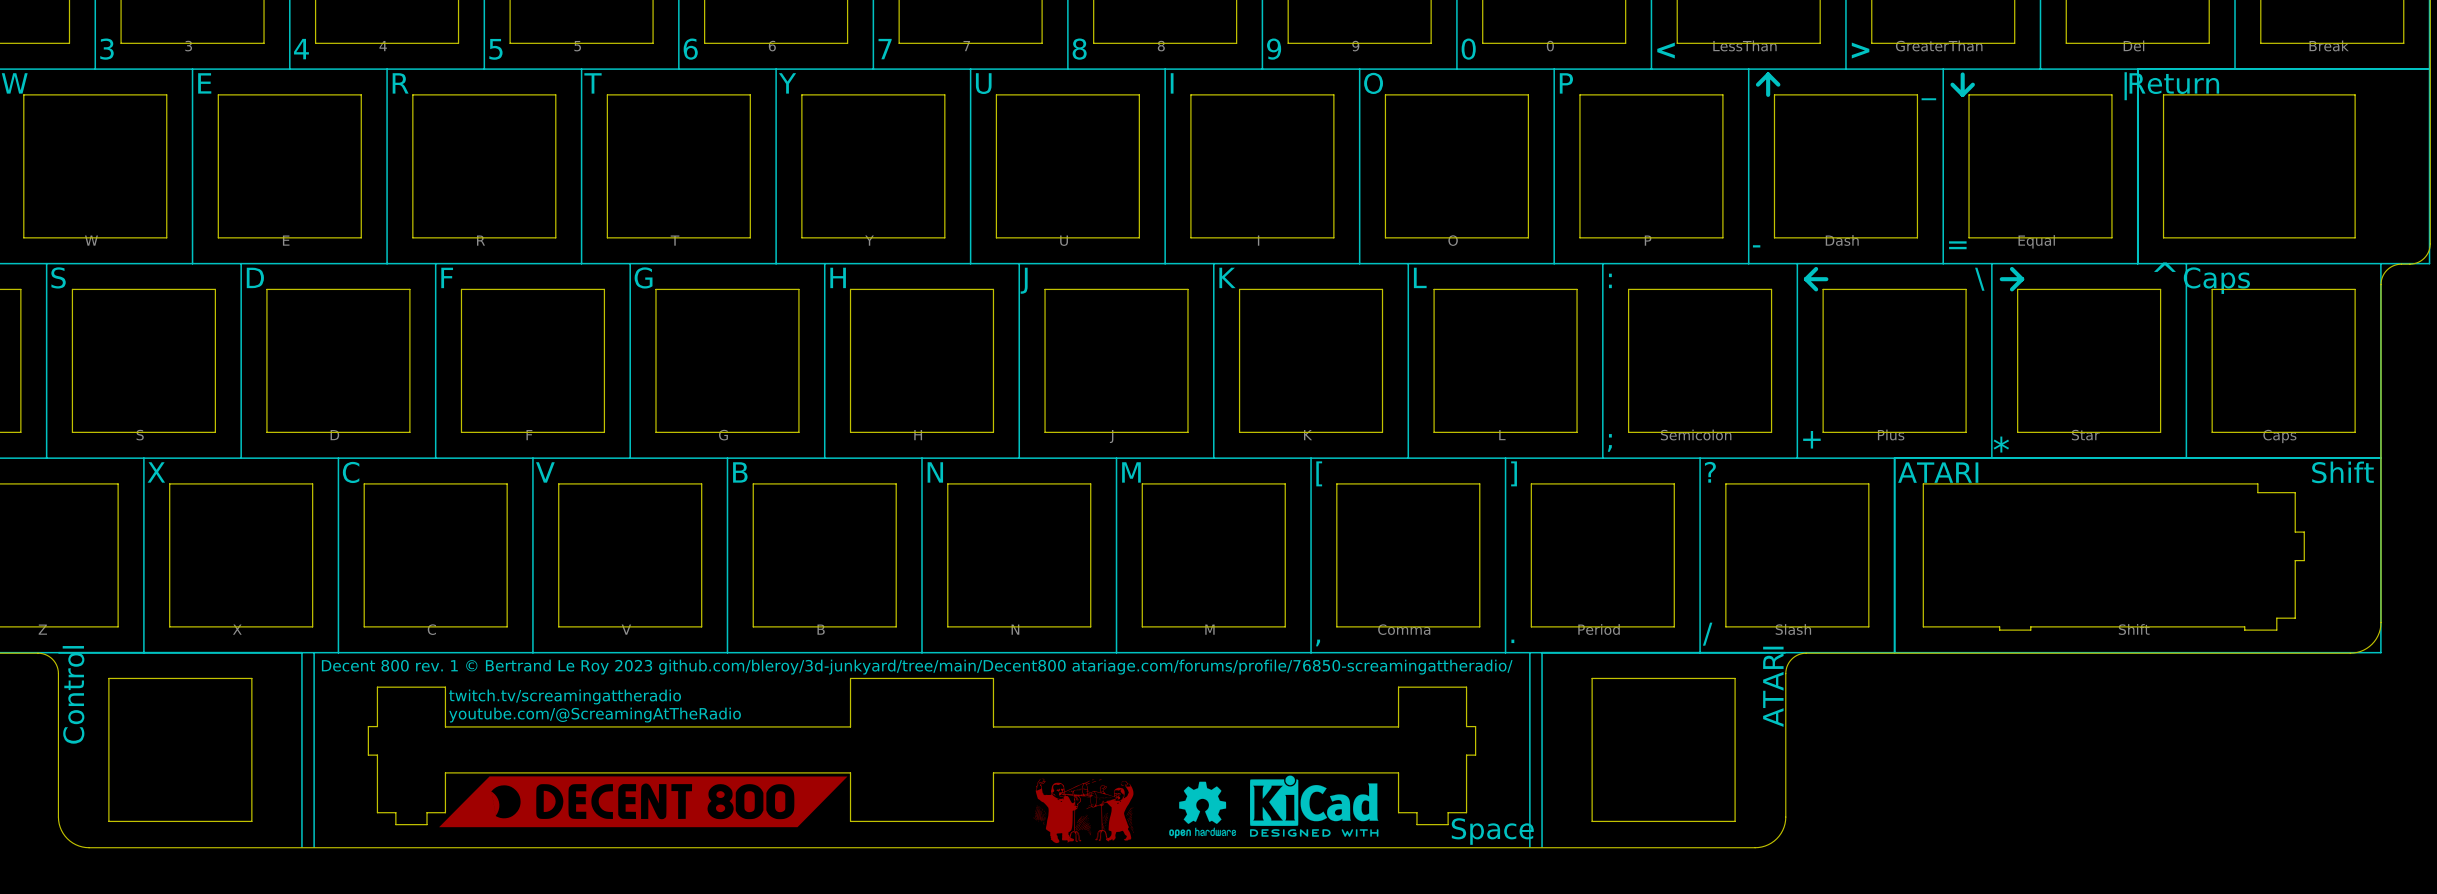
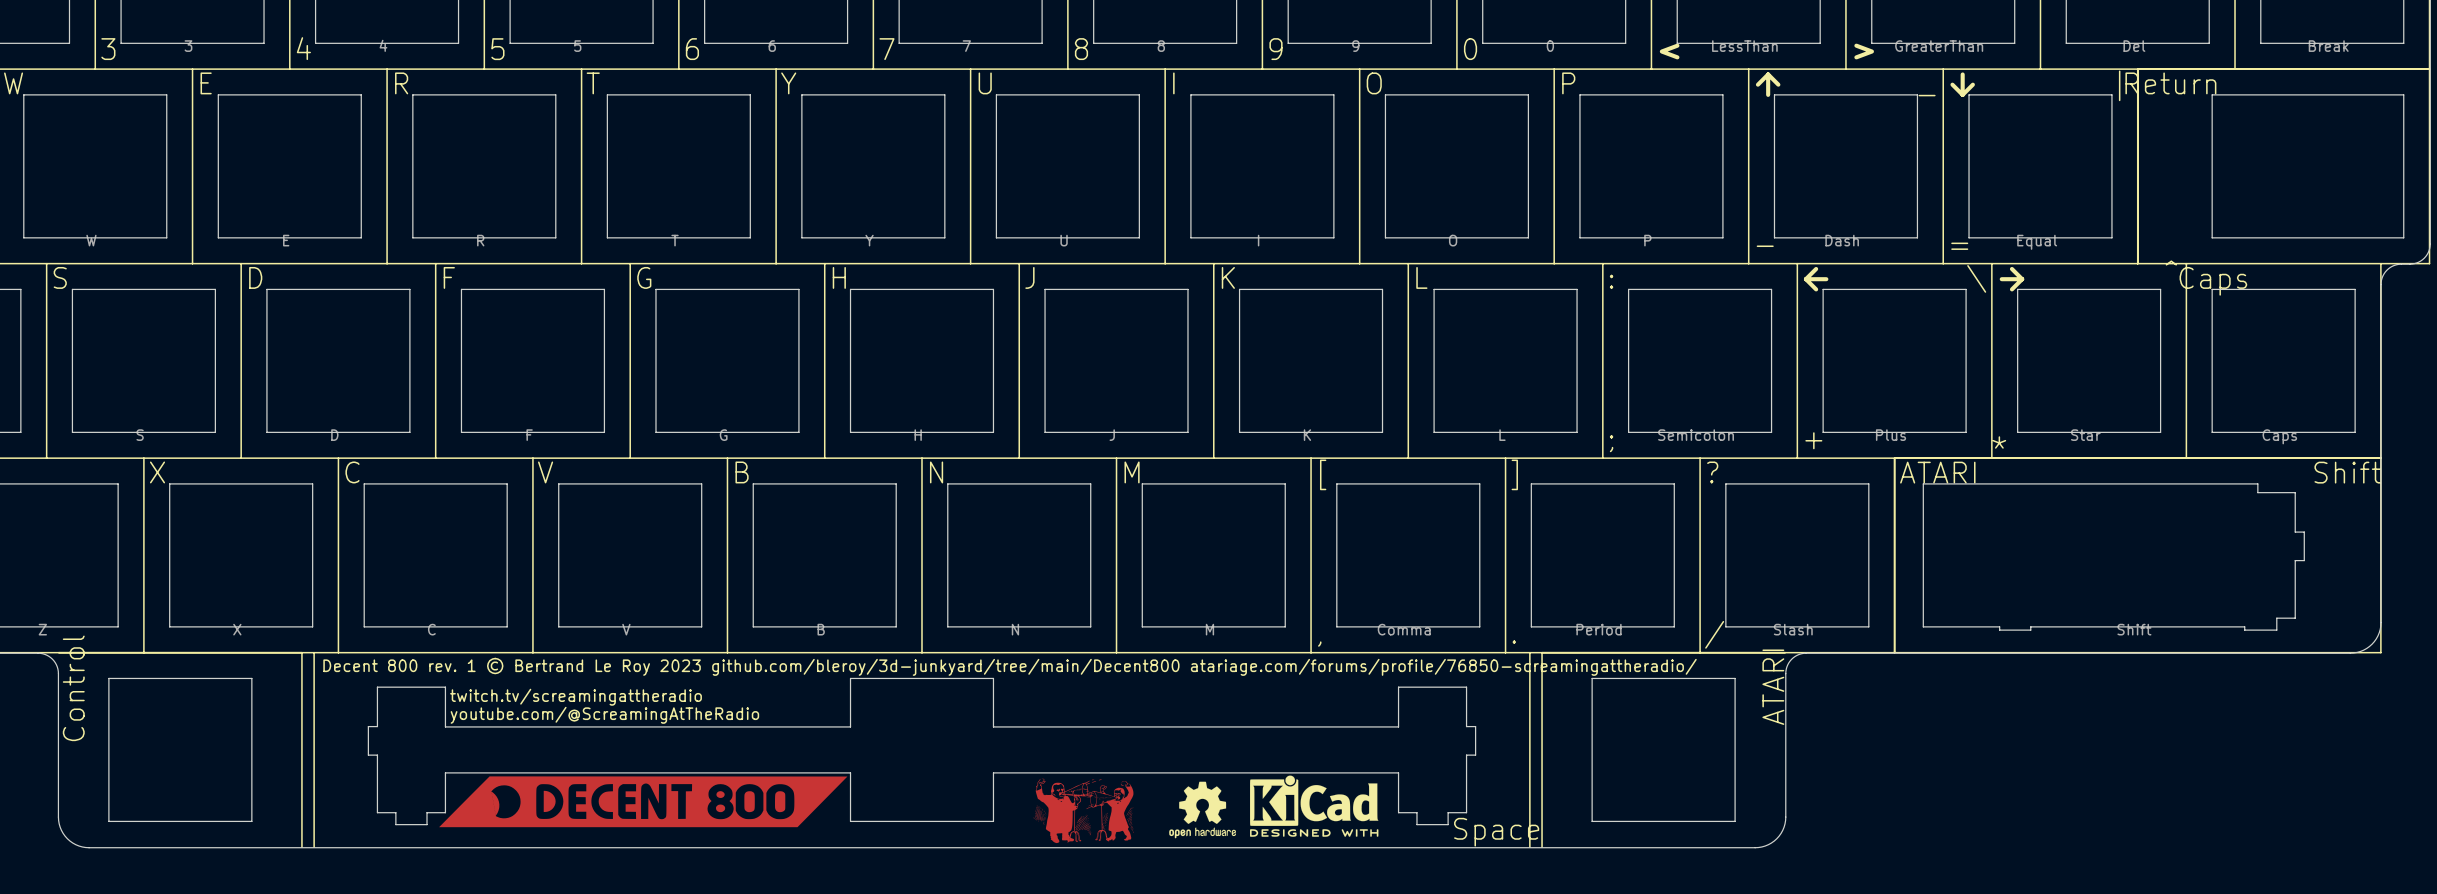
drawing shape: [2136, 68, 2431, 265] -> [2136, 68, 2431, 265]

